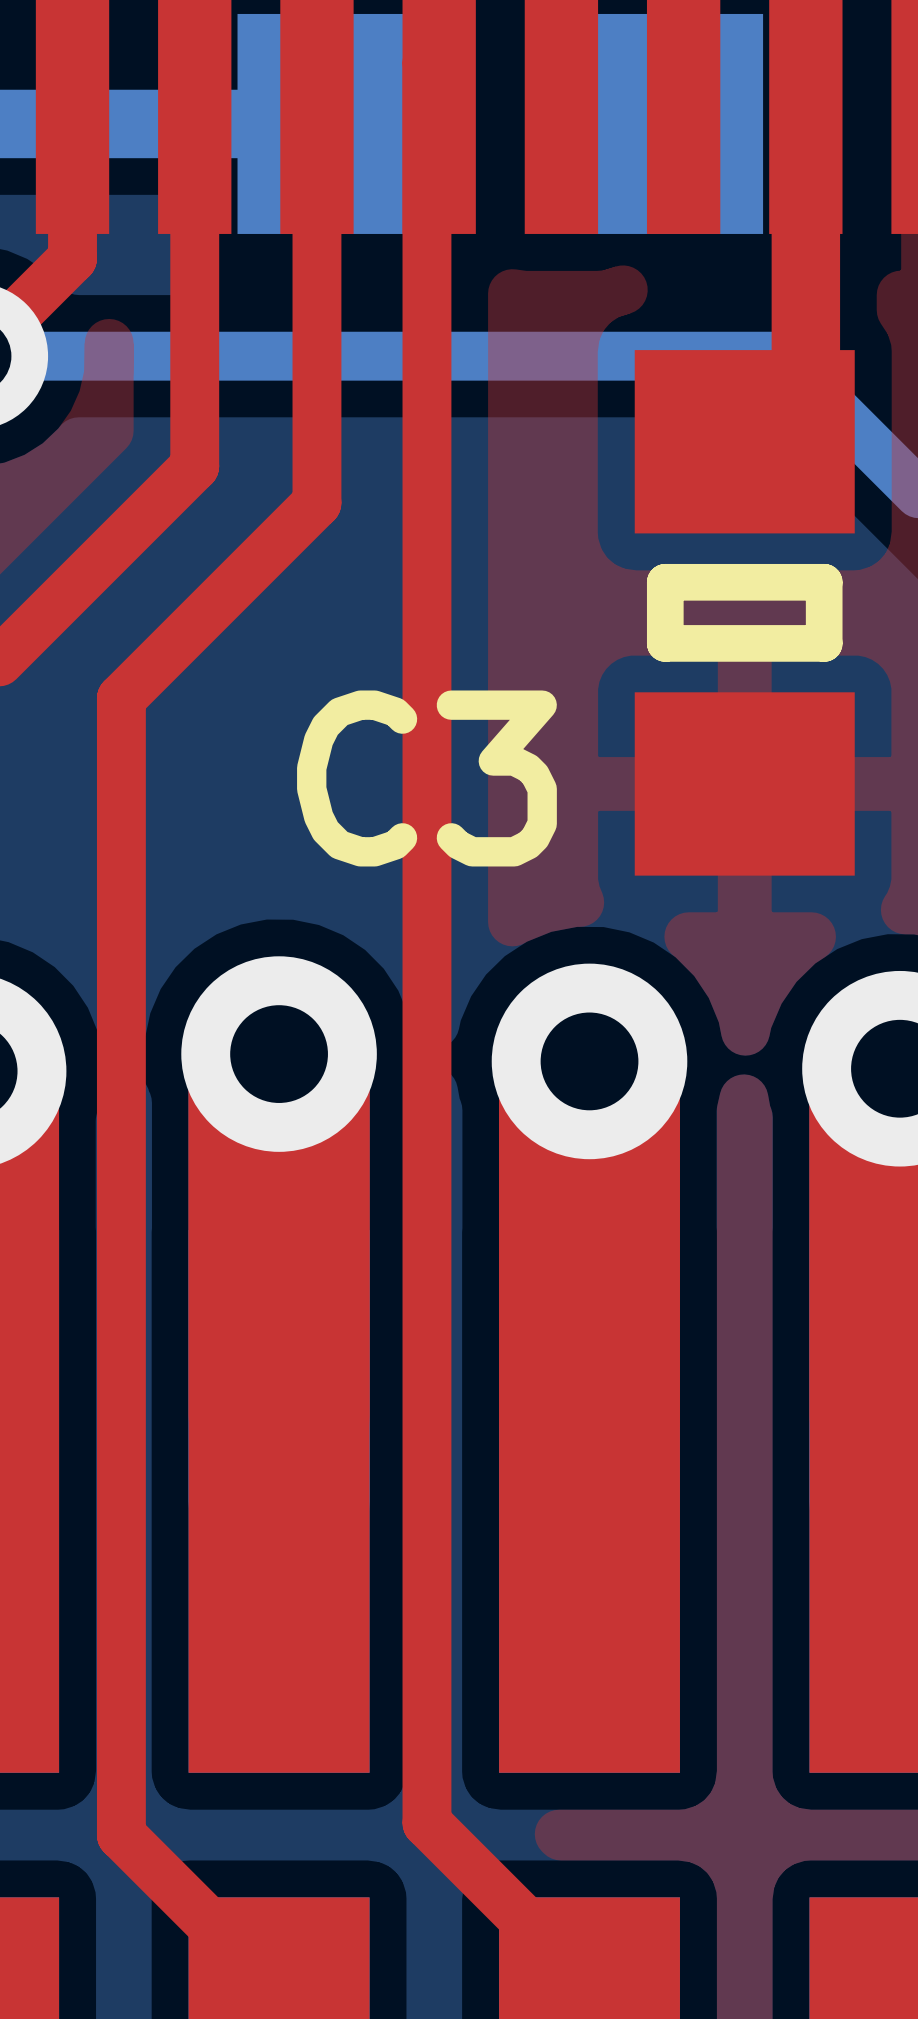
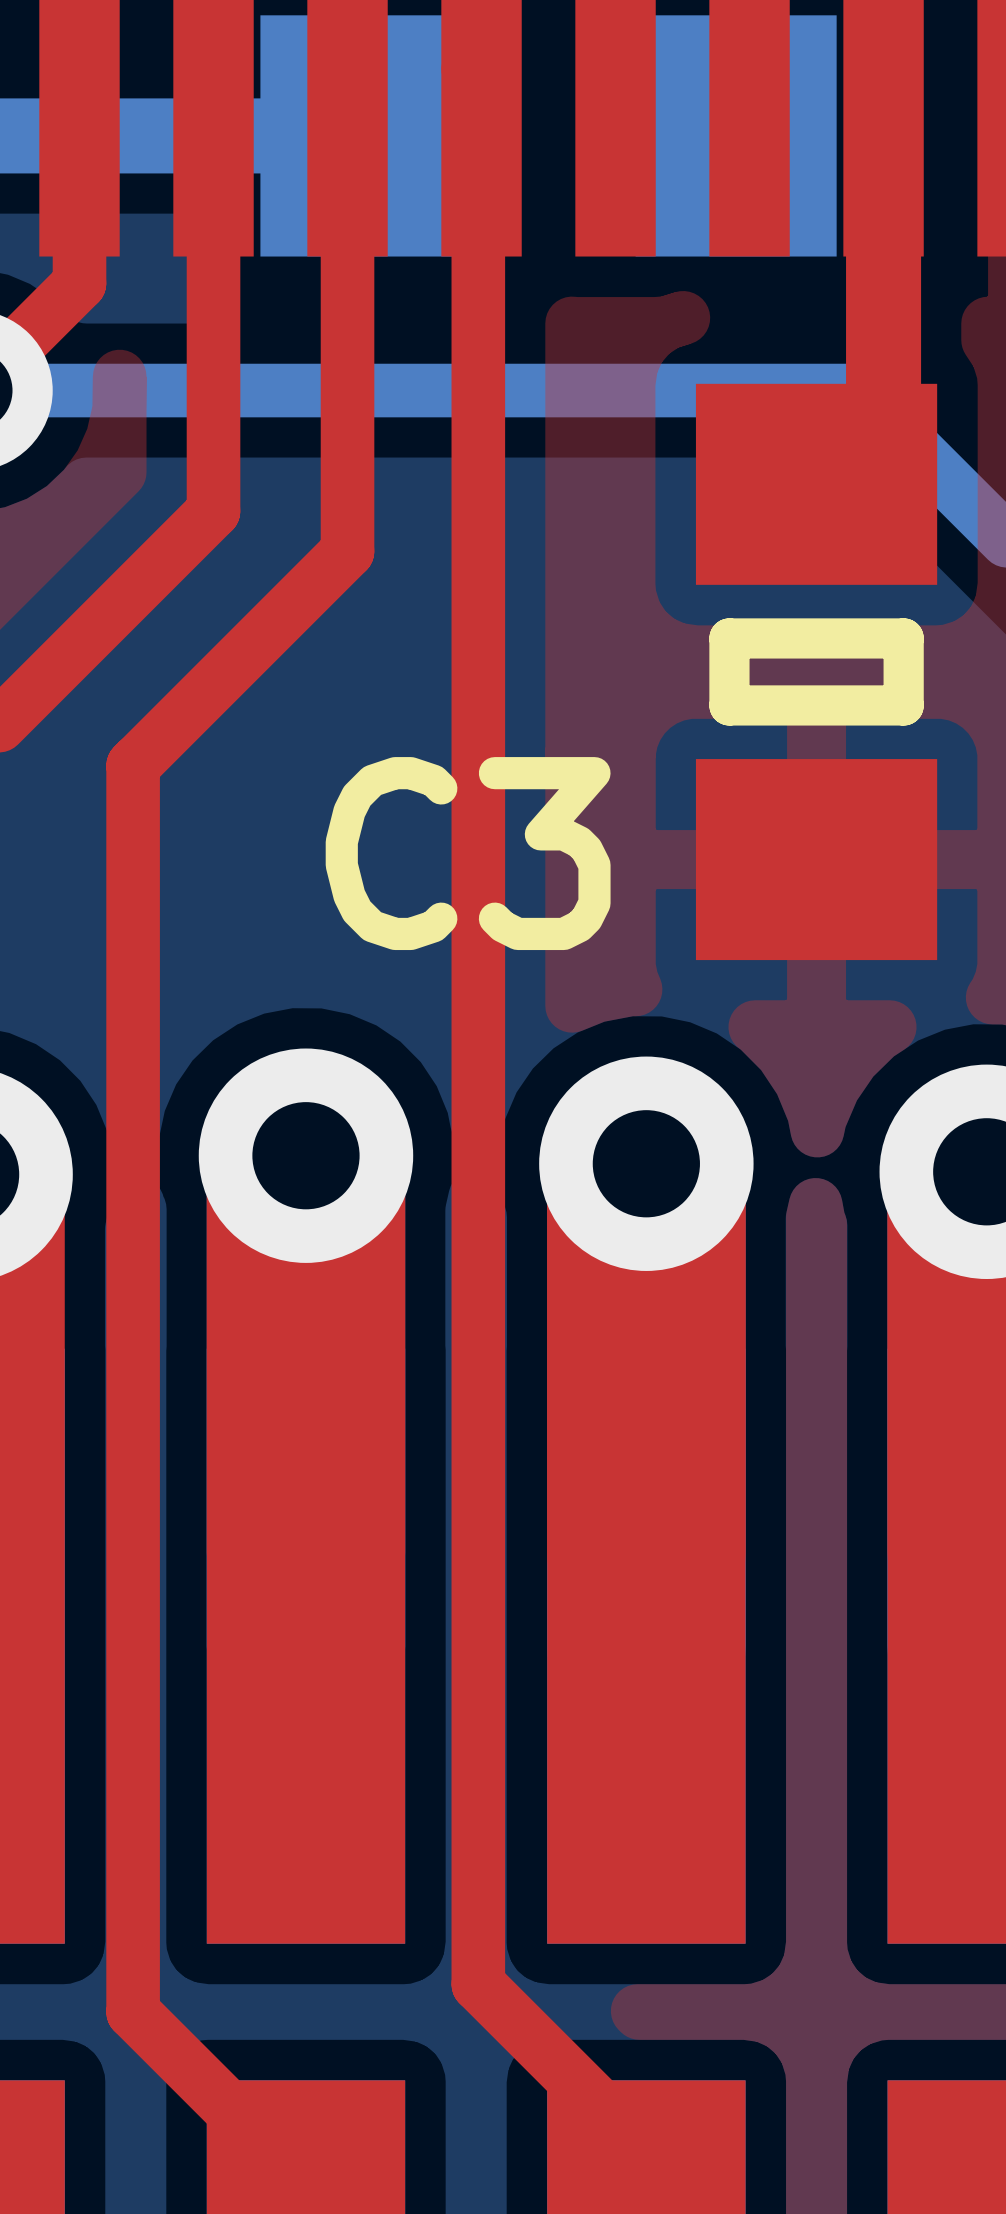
top track: (426, 62) (426, 1822) (589, 1985) -> (478, 58) (478, 1984) (646, 2152) (646, 2176)

